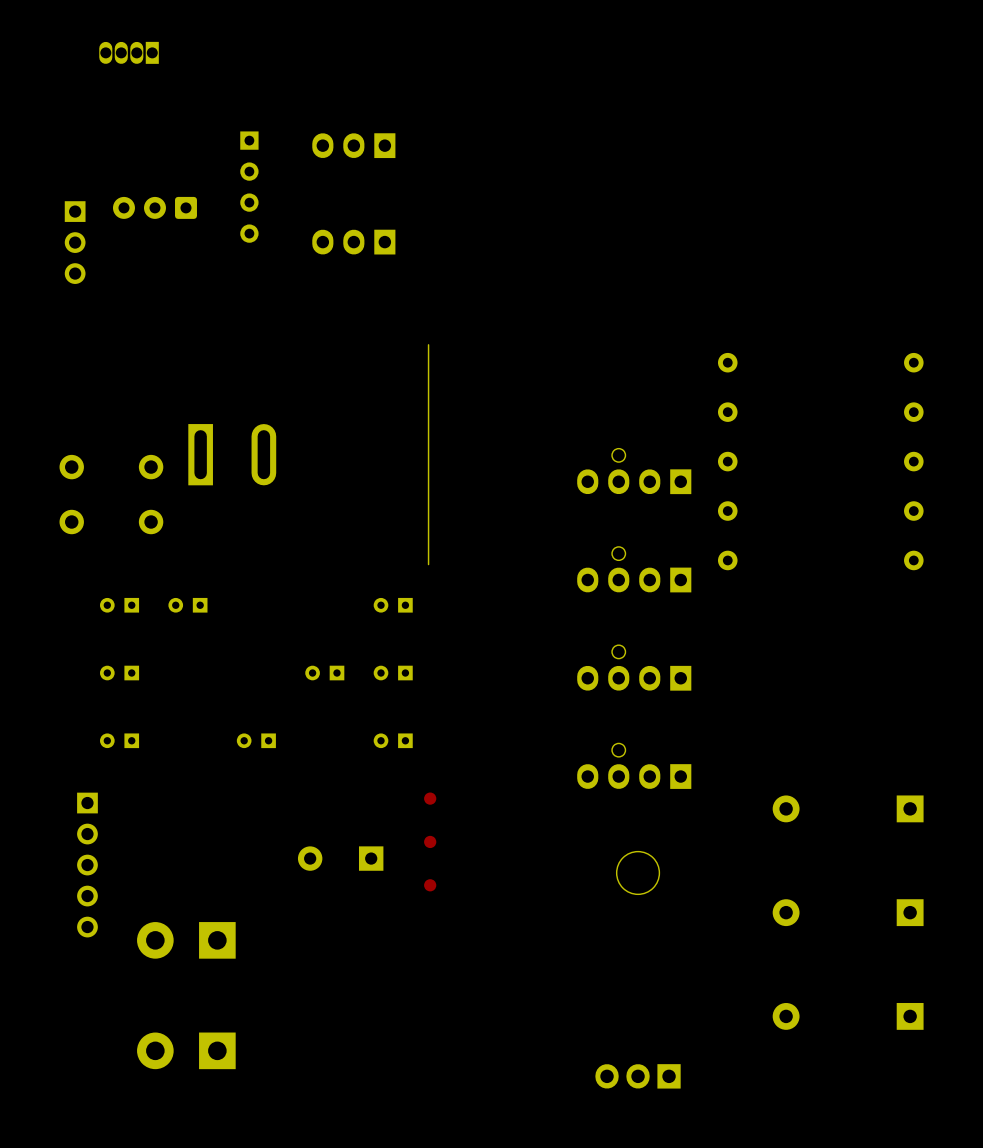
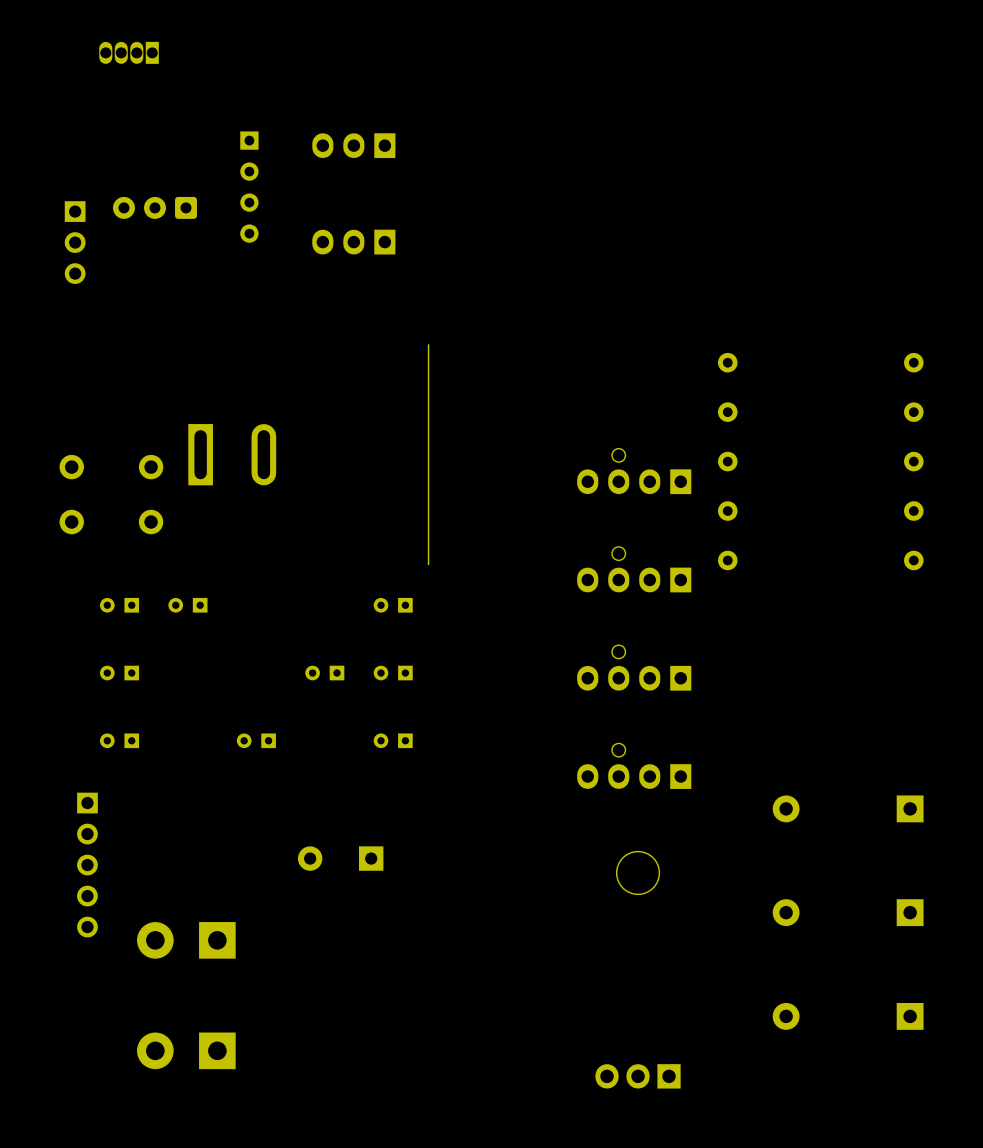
part: (430, 798) -> none
part: (430, 841) -> none
part: (430, 885) -> none

